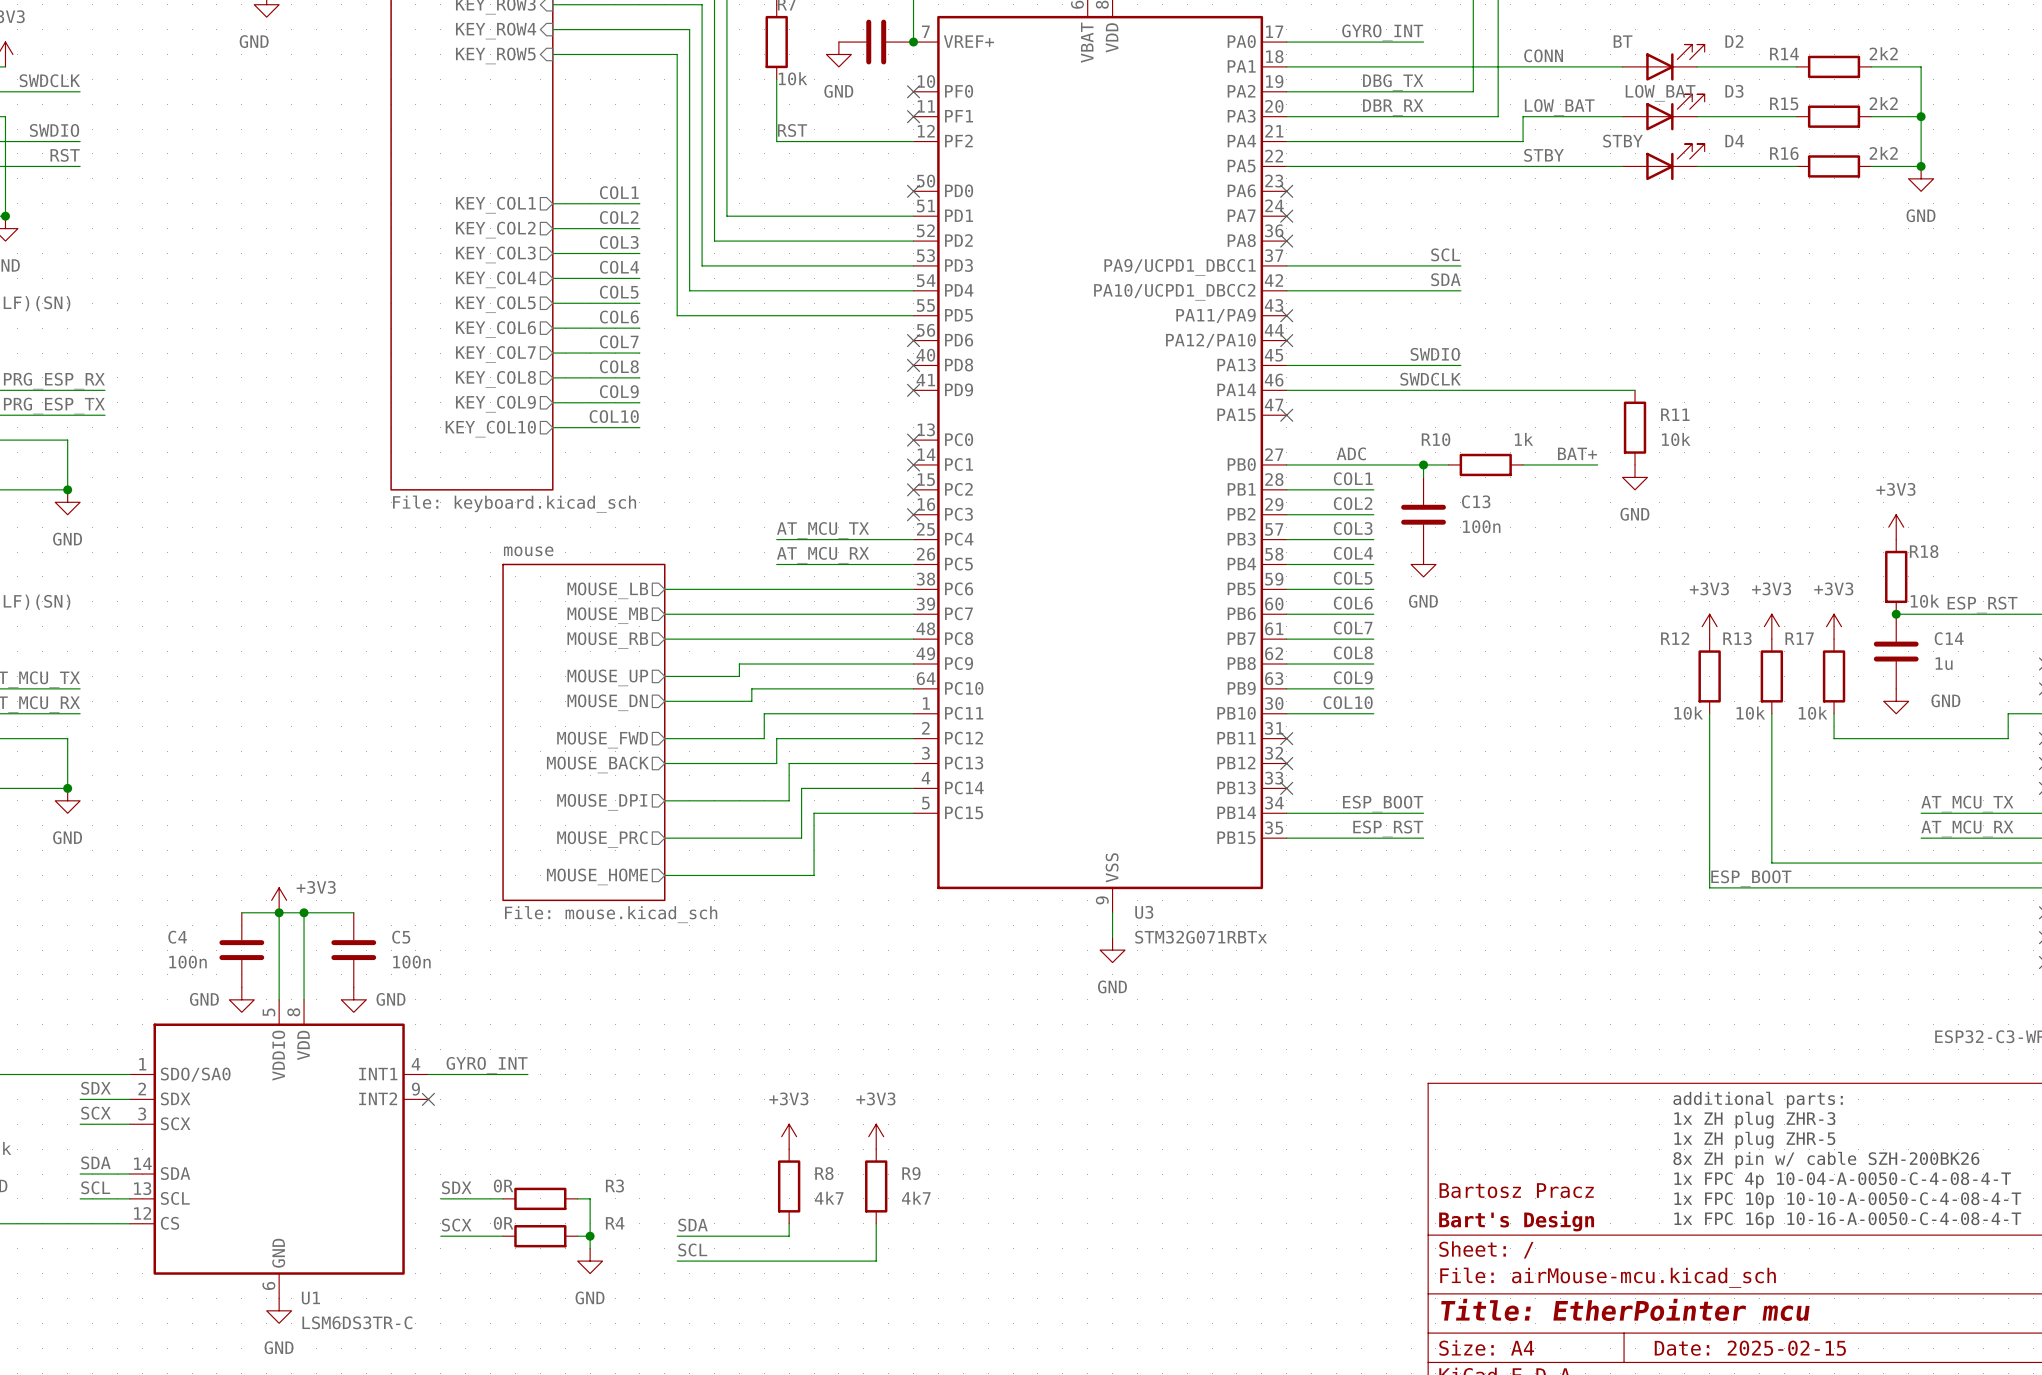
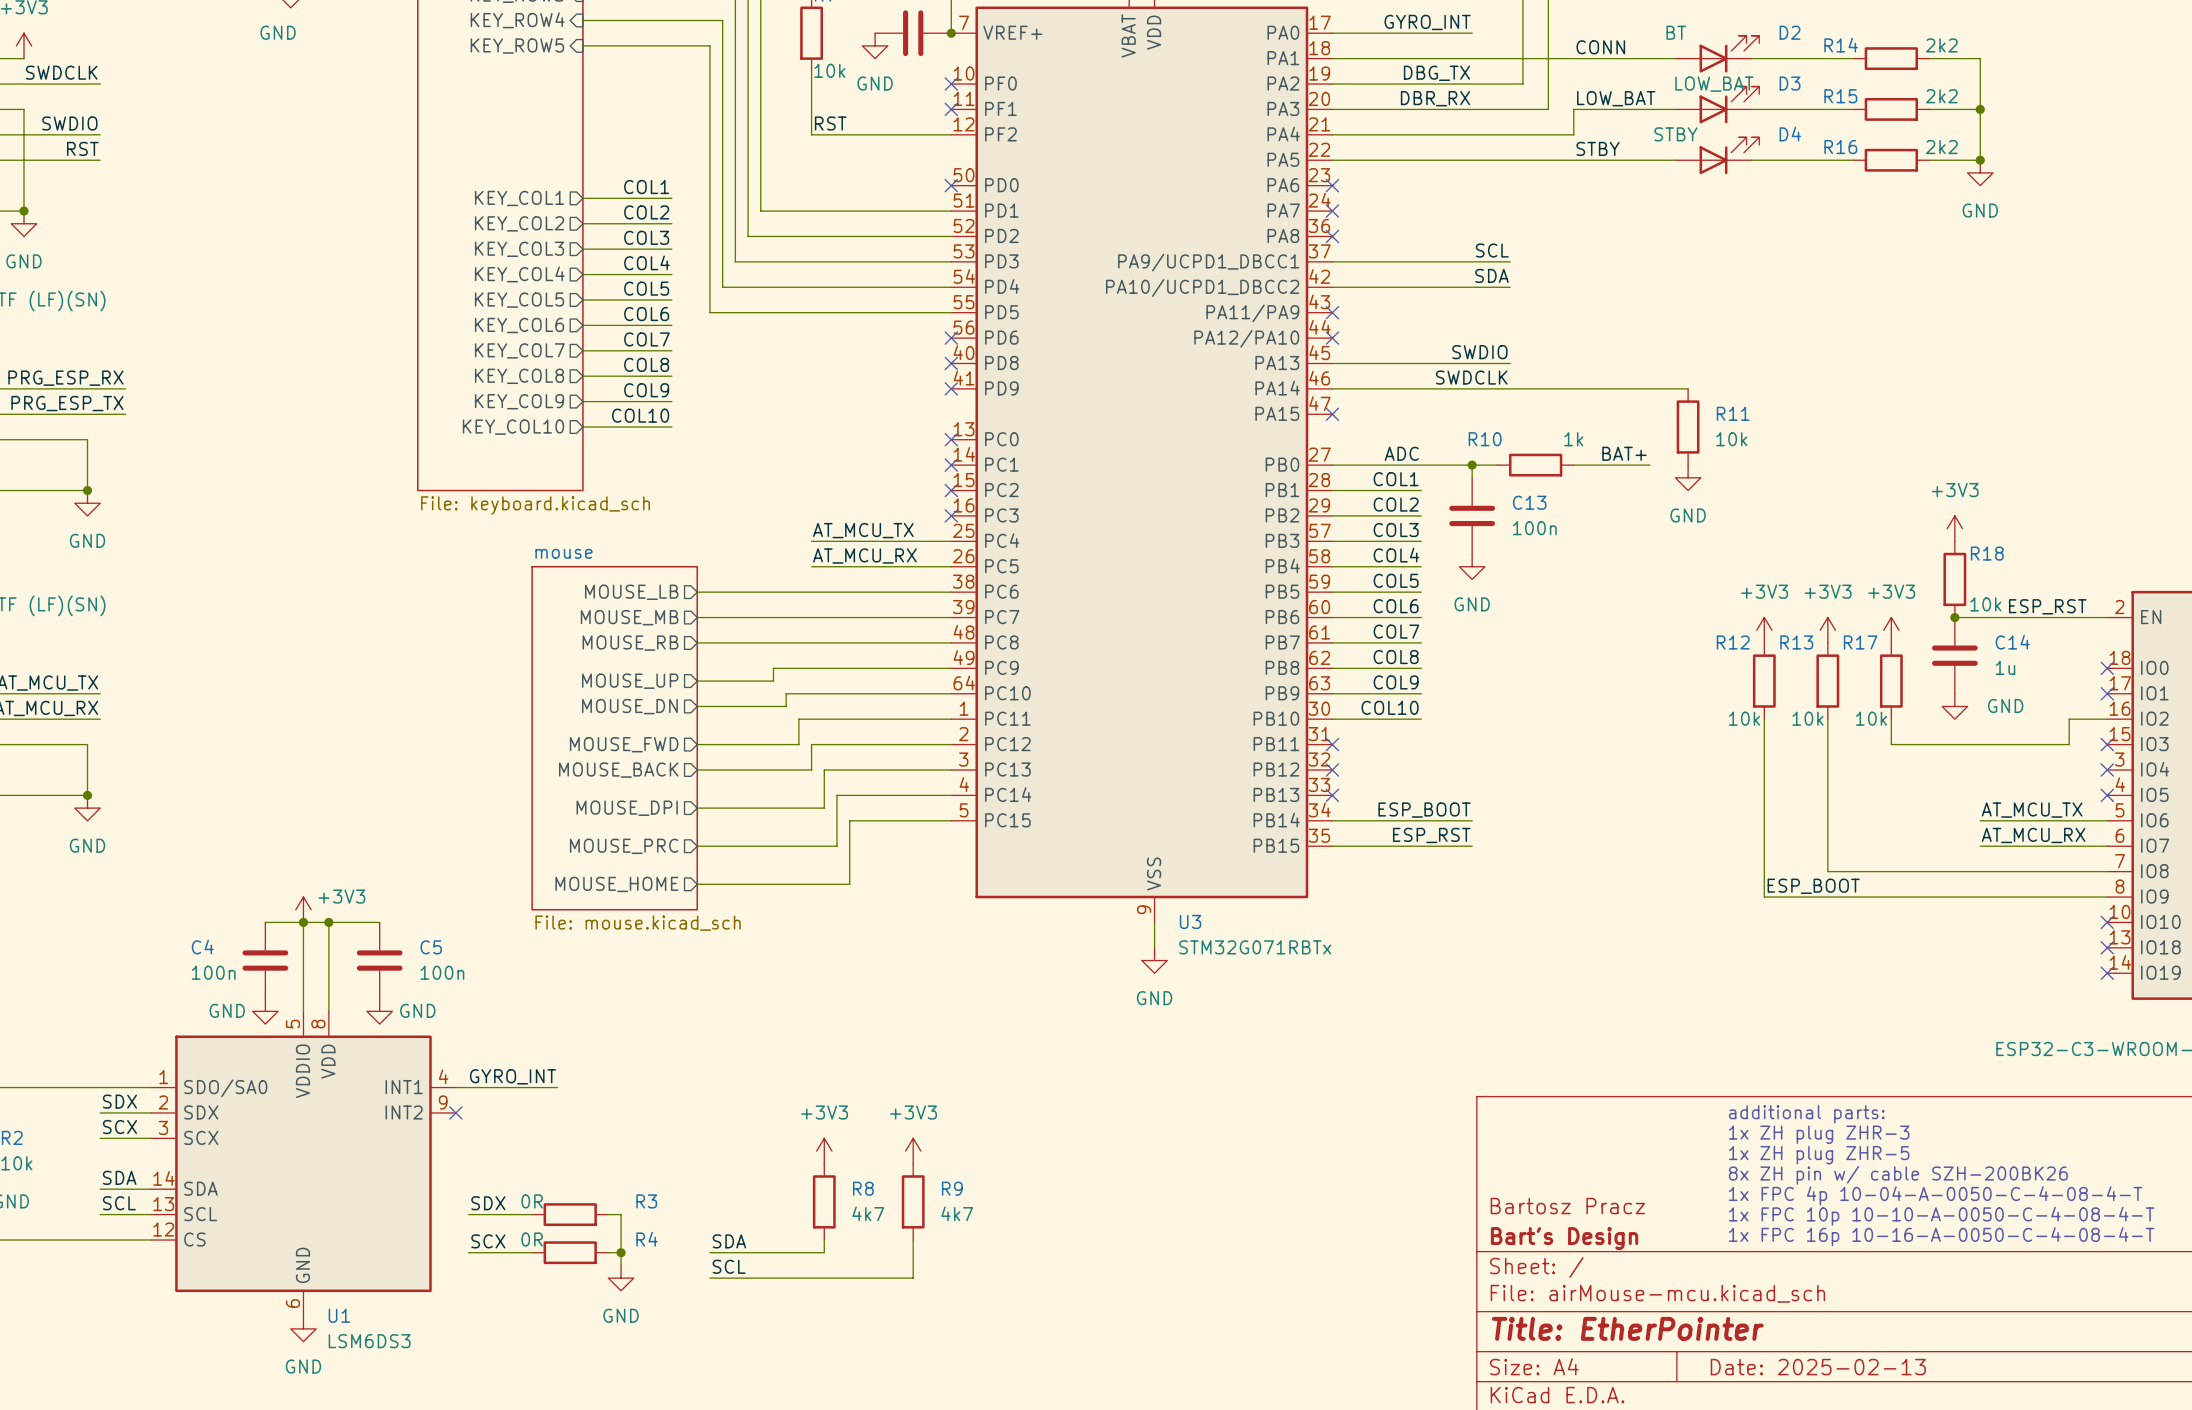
title block: Title: EtherPointer mcu (1625, 1309) -> Title: EtherPointer (1627, 1328)
U1 value: LSM6DS3TR-C (357, 1322) -> LSM6DS3 (369, 1341)
title block: Date: 2025-02-15 (1750, 1348) -> Date: 2025-02-13 (1818, 1367)

